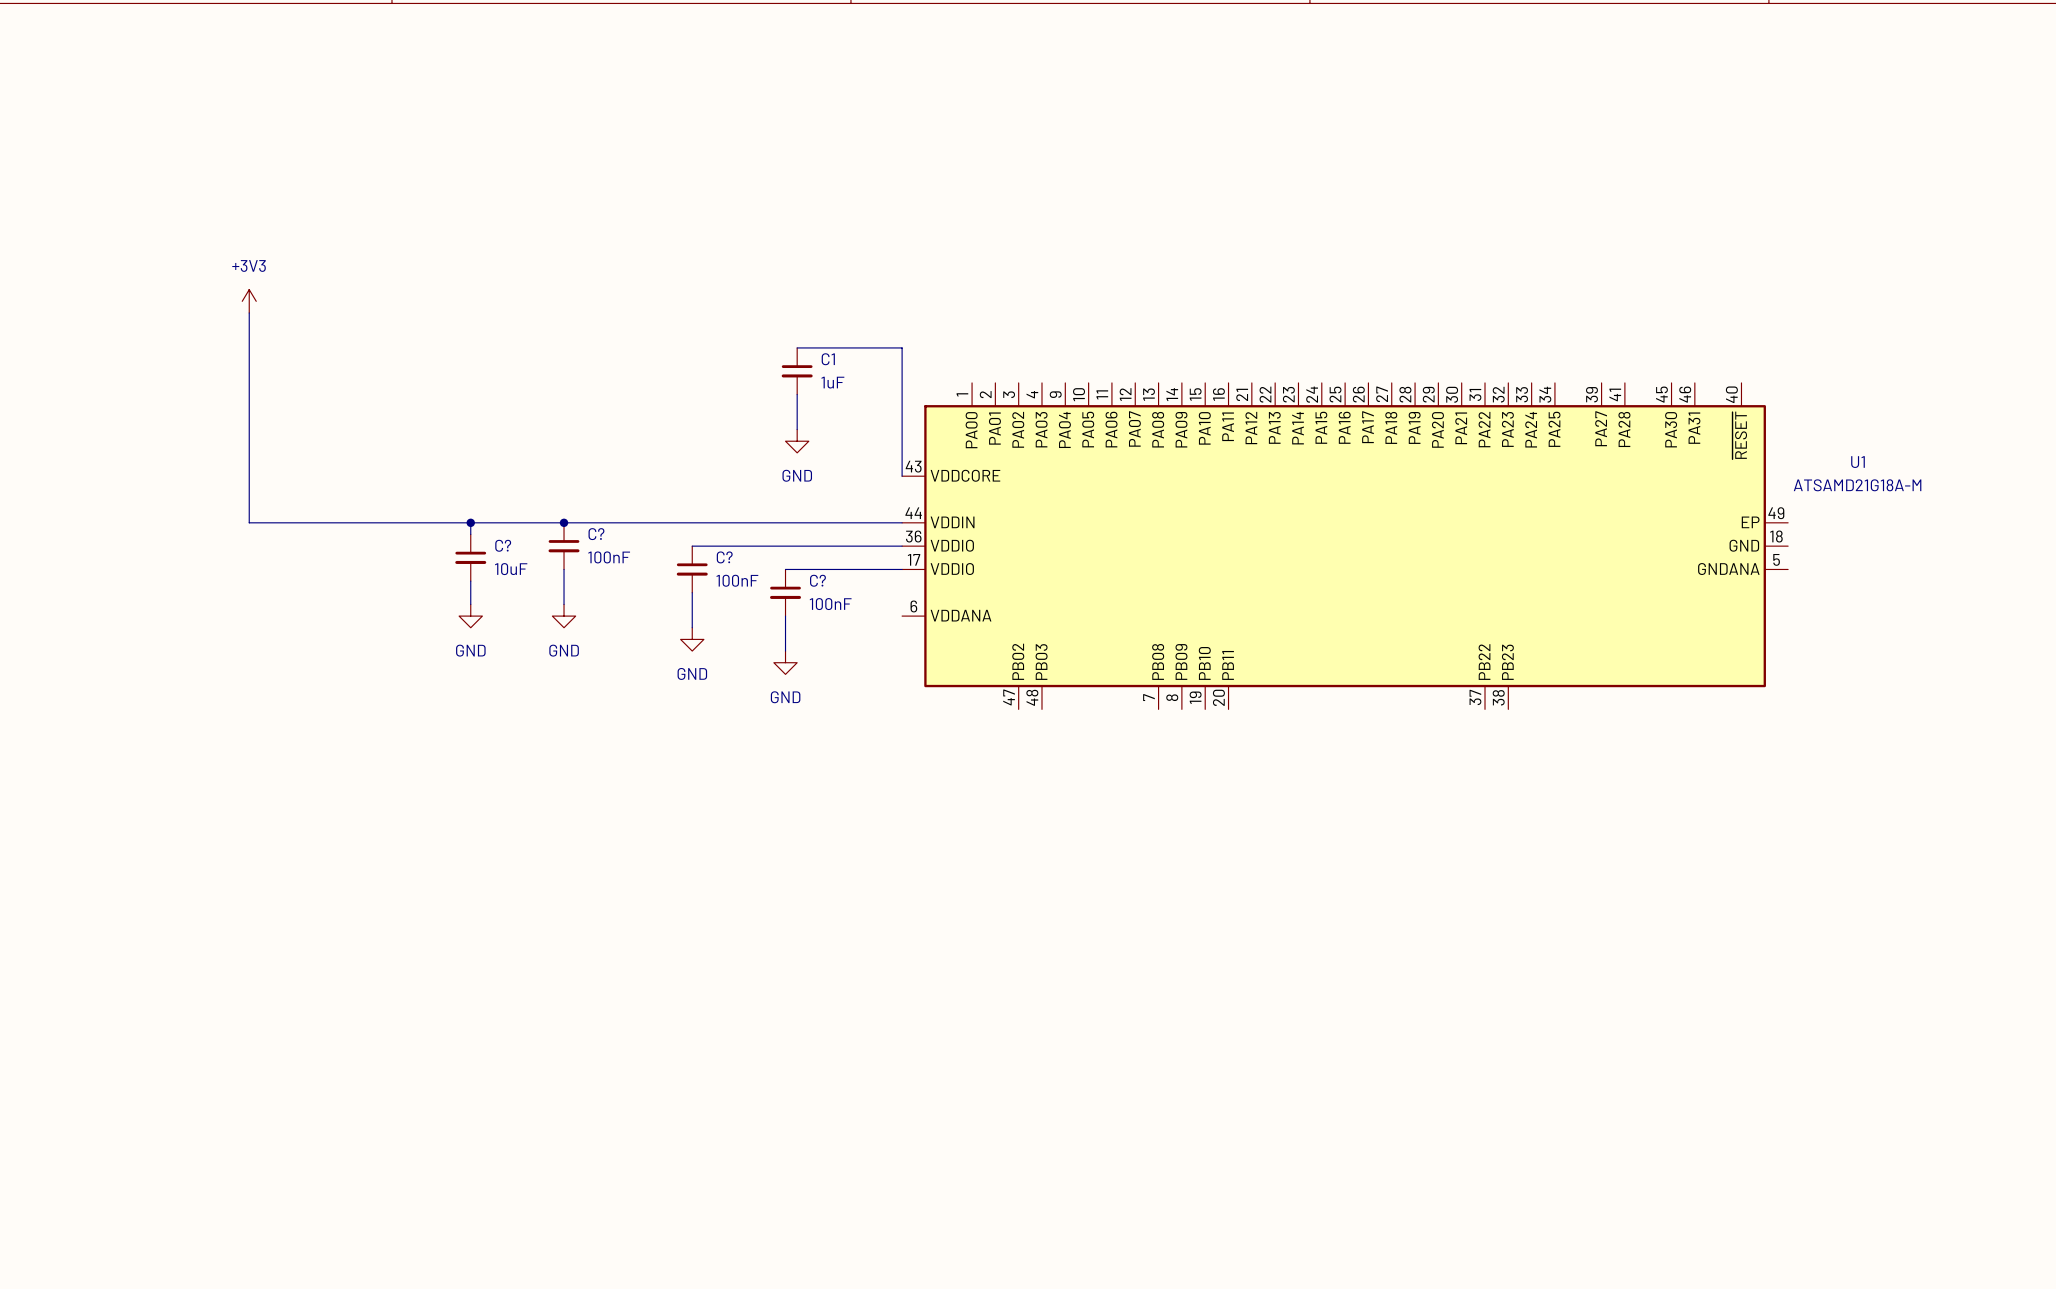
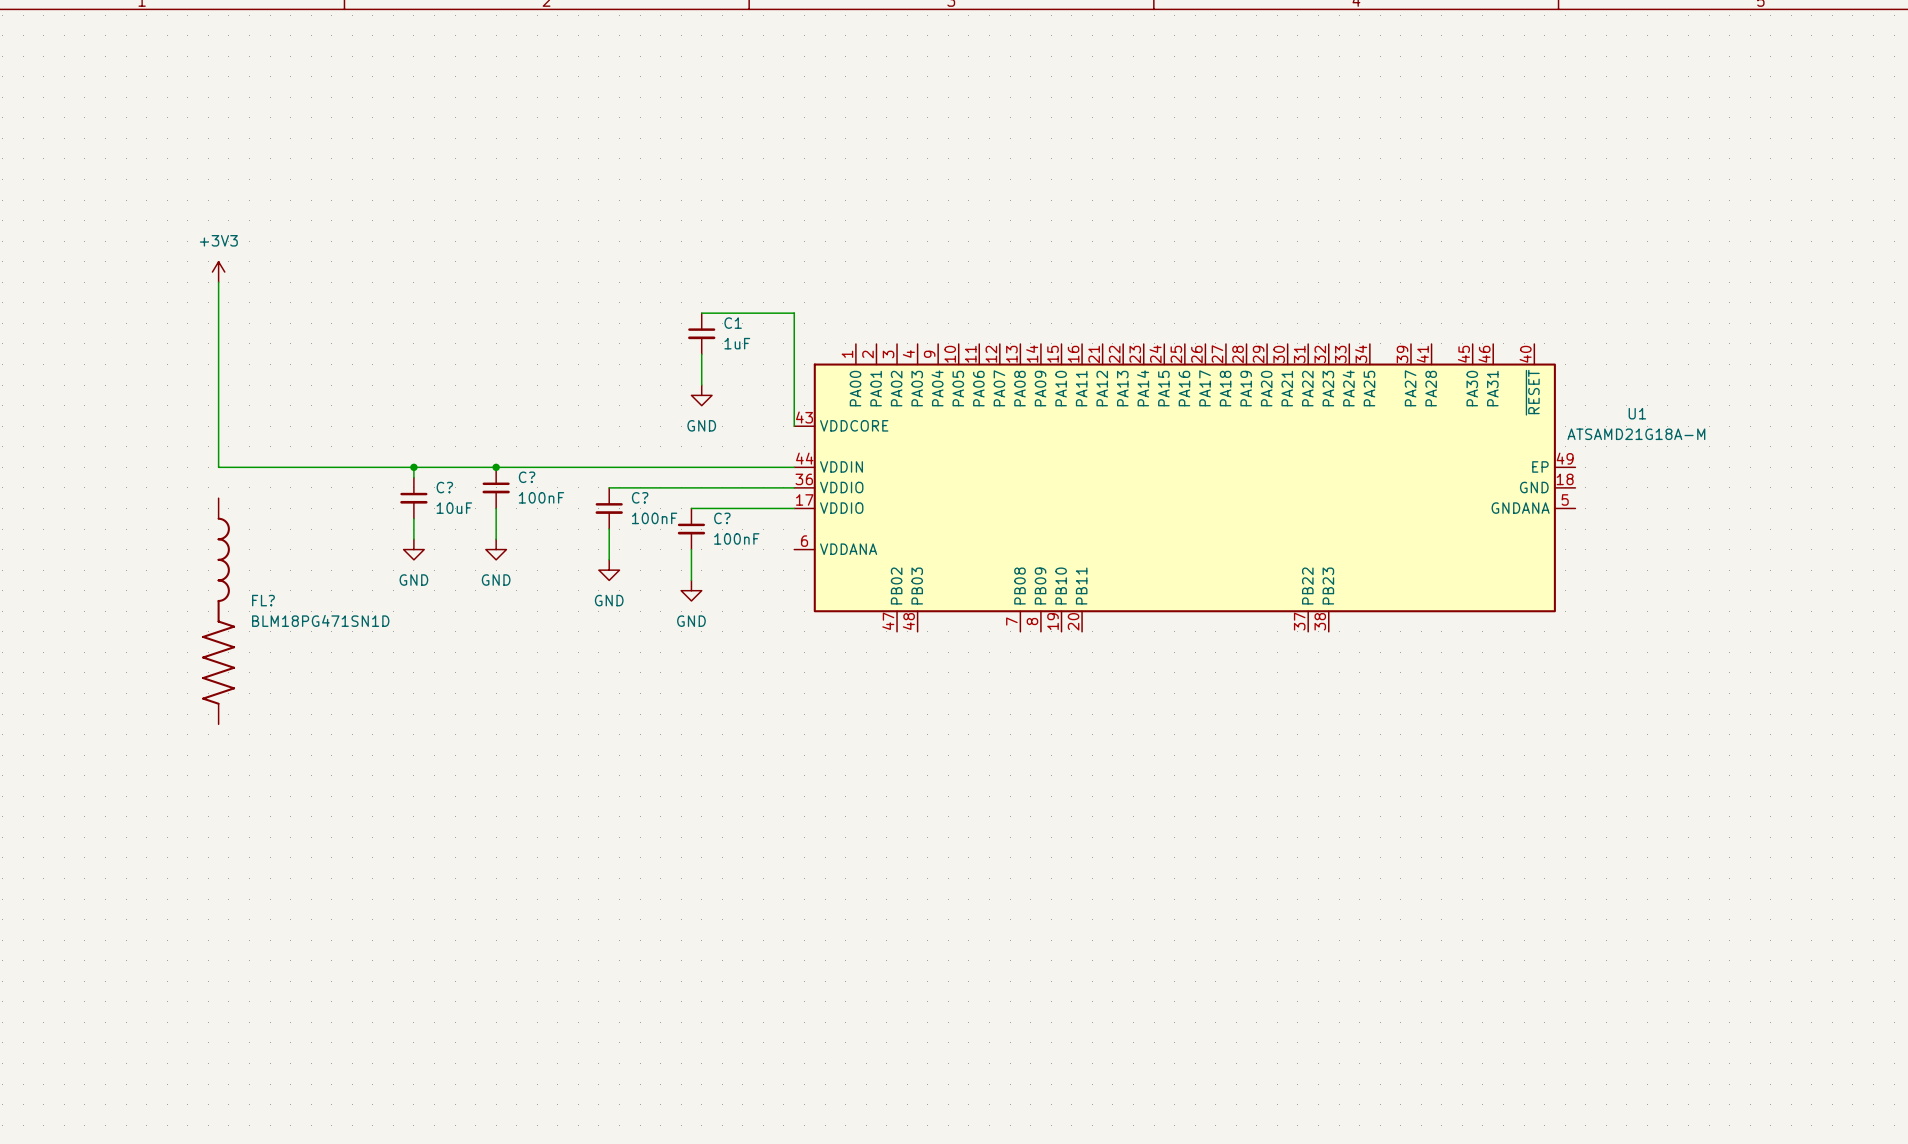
FL?: none -> BLM18PG471SN1D (218, 611)

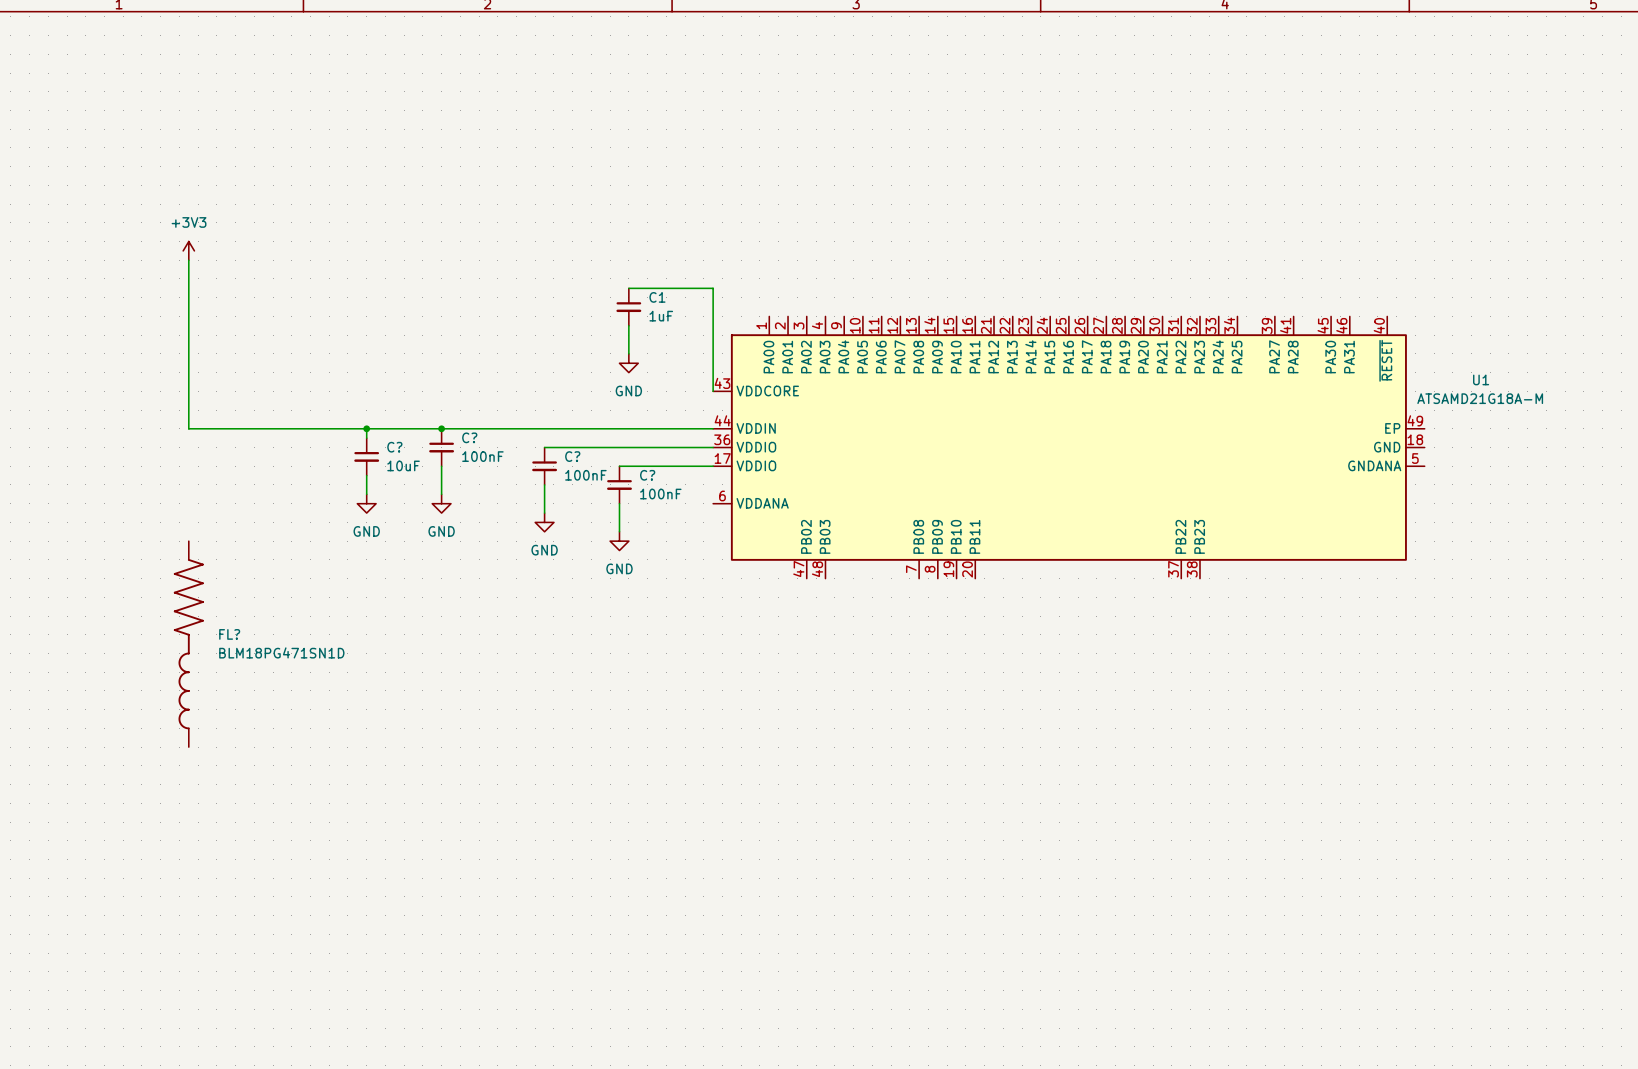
FL? rotation: 0° (218, 611) -> 180° (188, 644)

